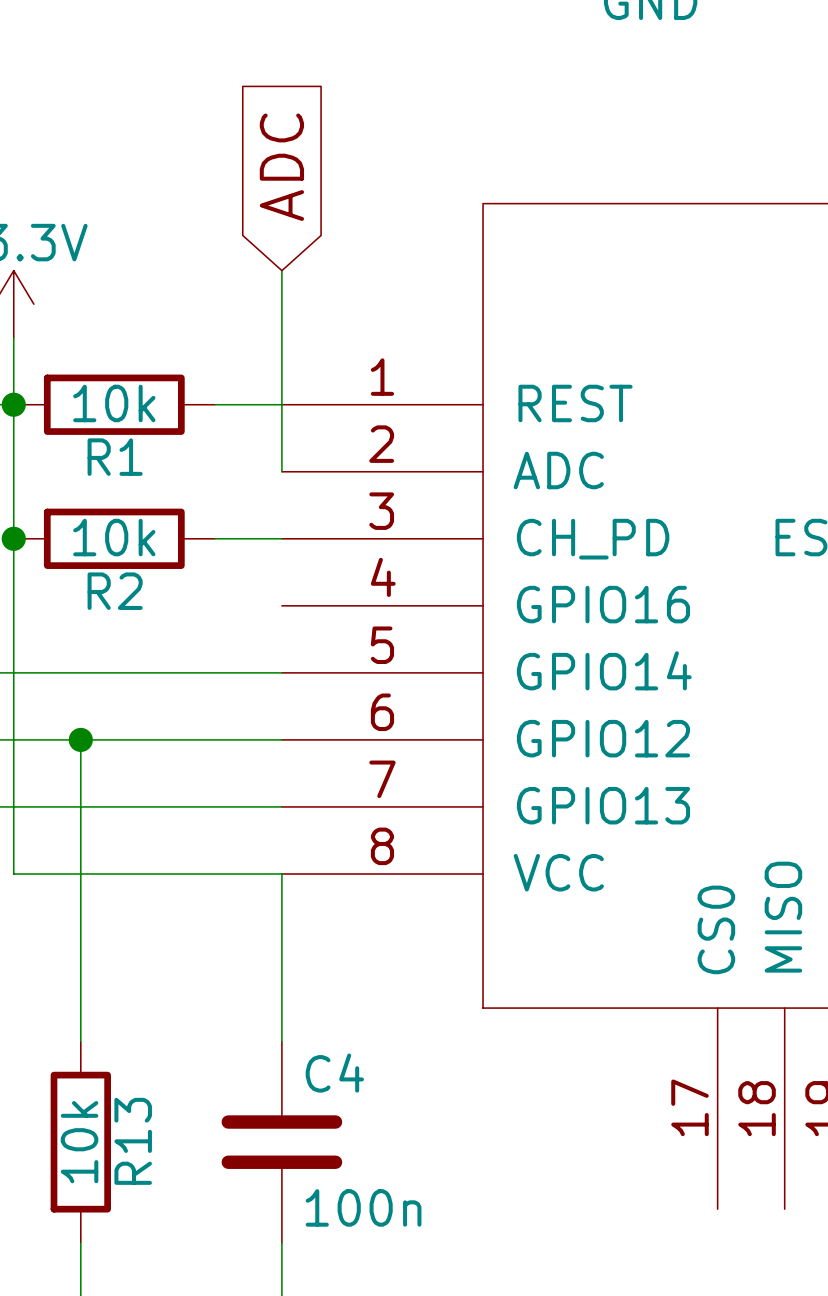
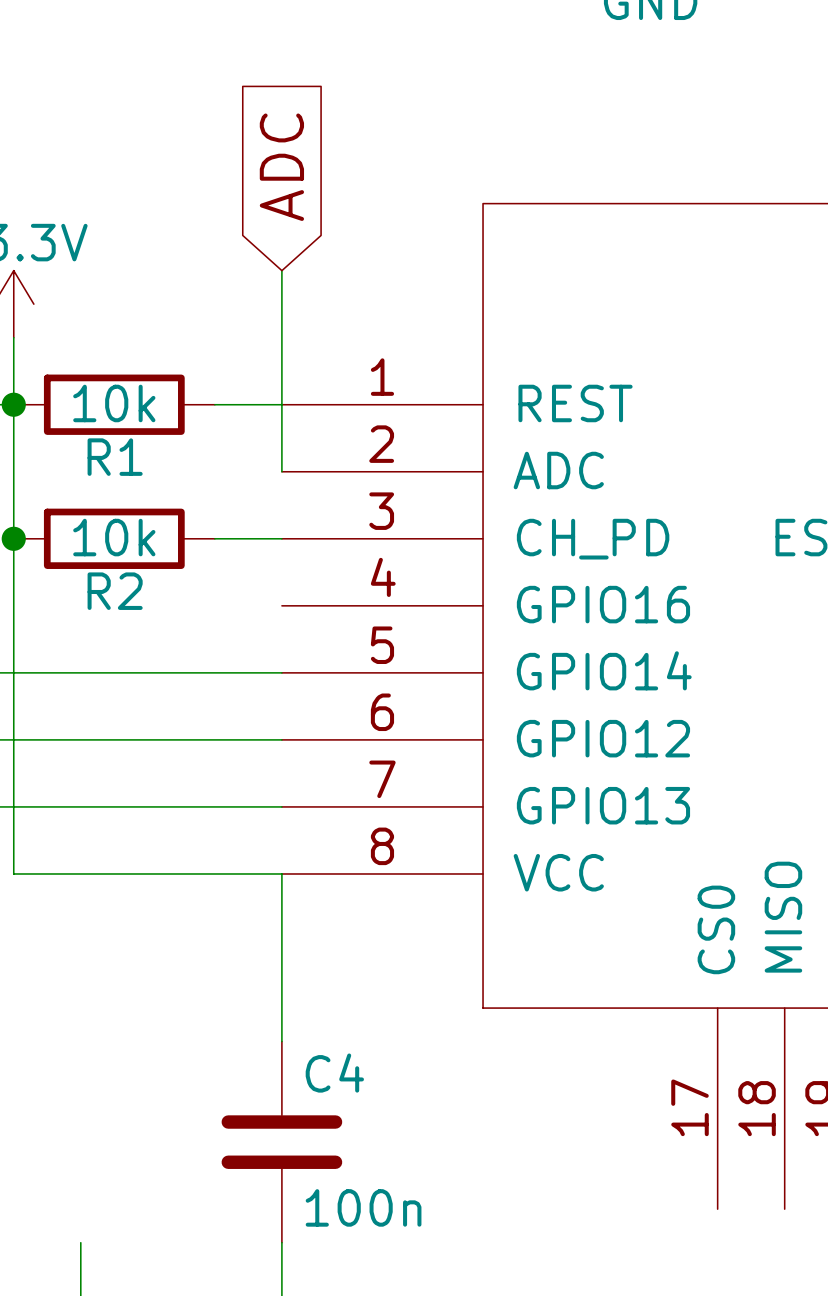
wire: (80, 739) (80, 1041) -> none
junction: (80, 739) -> none
R13: 10k (80, 1142) -> none

